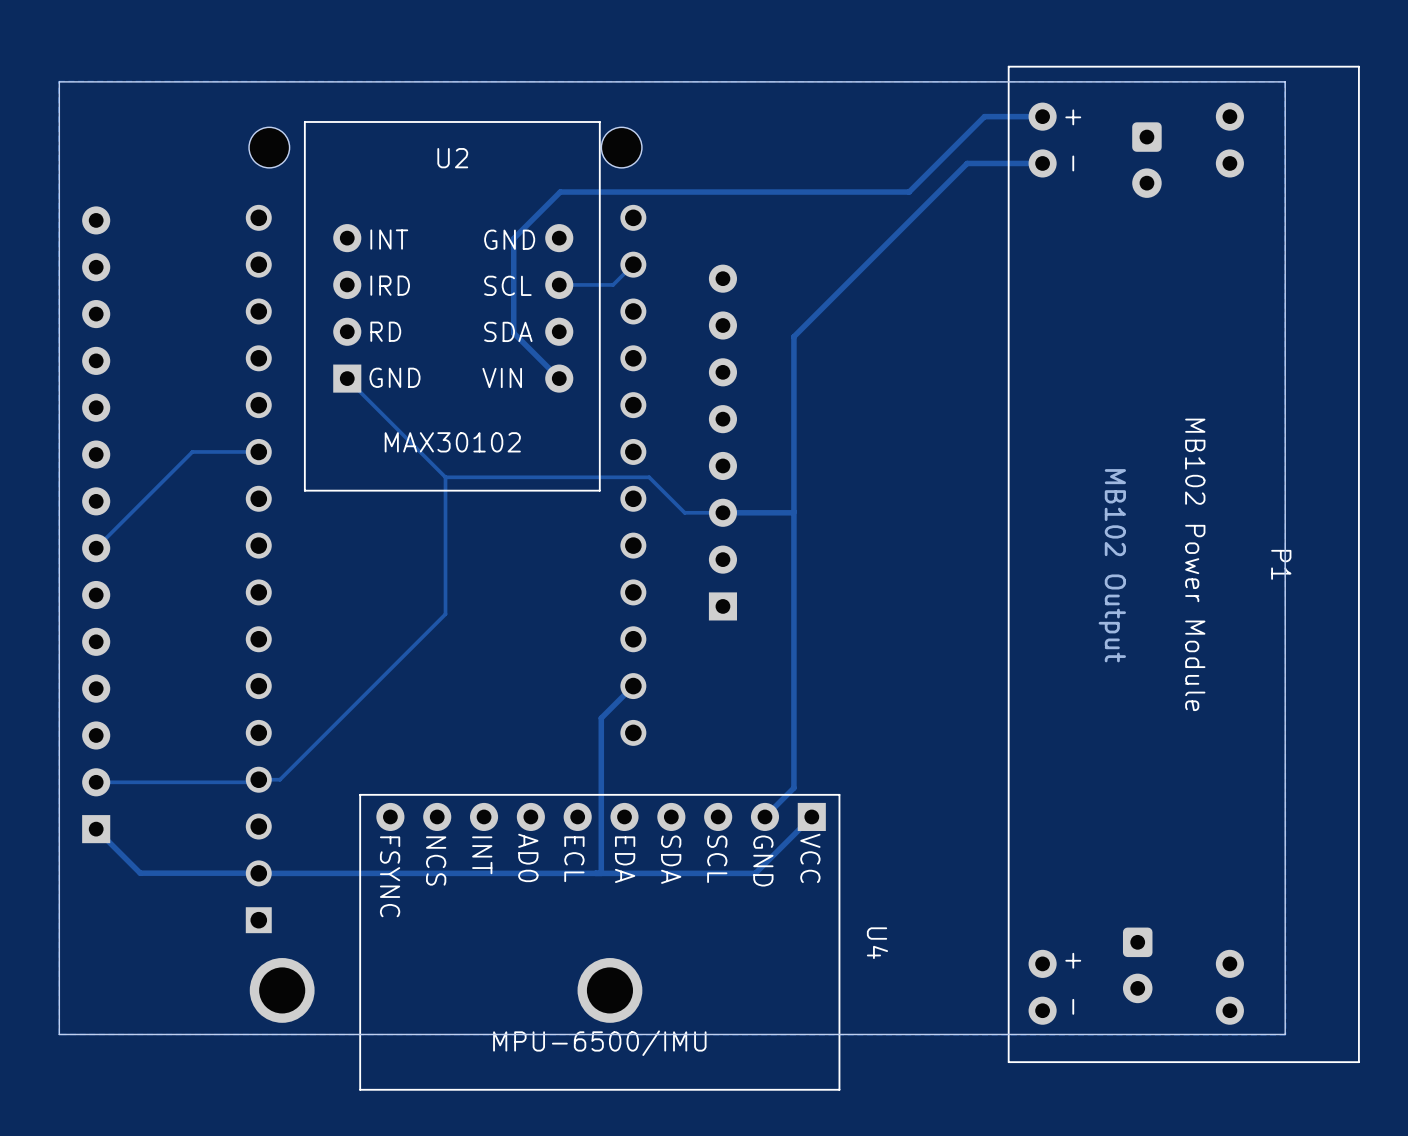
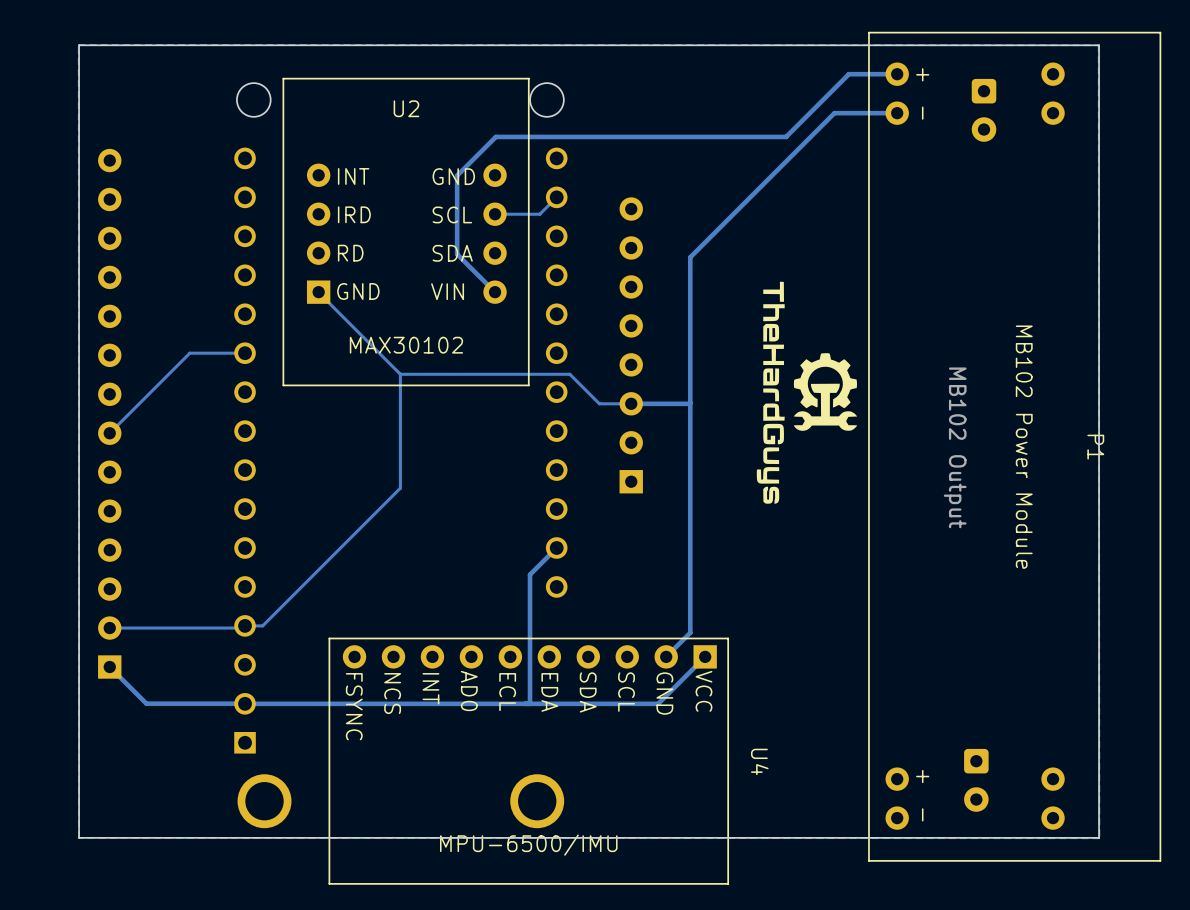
drawing: none -> [756, 281, 858, 504]

